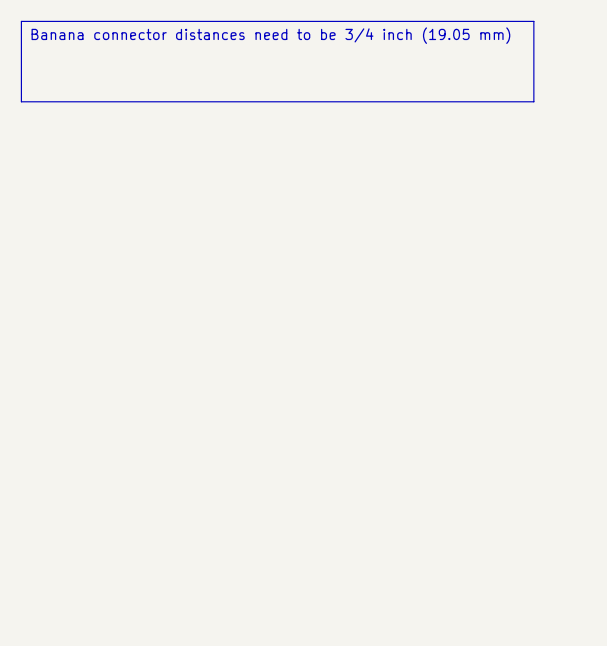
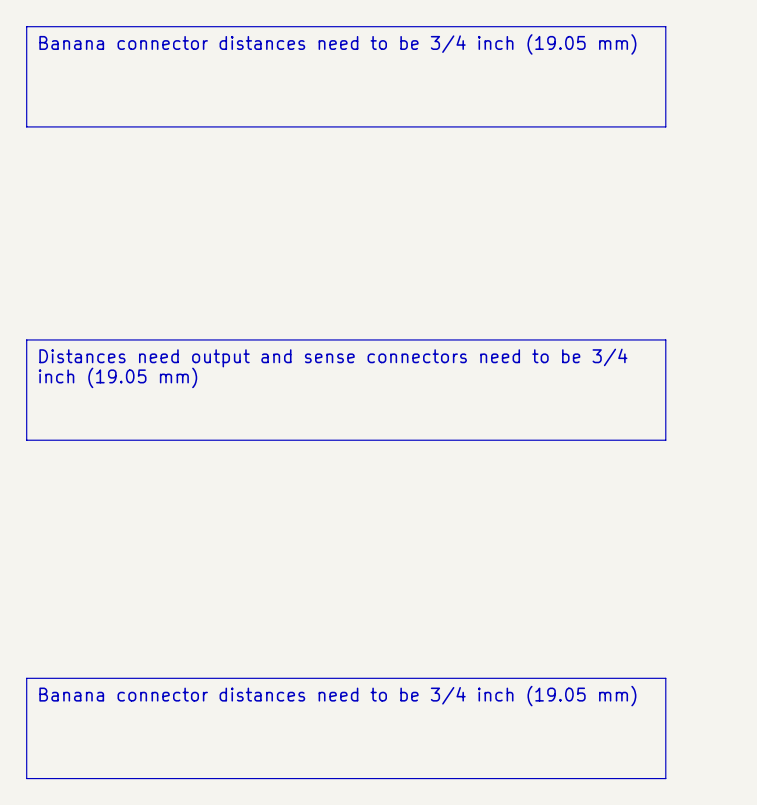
line: none -> (26, 339) (26, 440) (665, 440) (665, 339) (26, 339)
text: none -> Distances need output and sense connectors need to be 3/4 (333, 358)
text: none -> inch (19.05 mm) (117, 377)
line: none -> (26, 678) (26, 778) (665, 778) (665, 678) (26, 678)
text: none -> Banana connector distances need to be 3/4 inch (19.05 mm) (337, 696)

